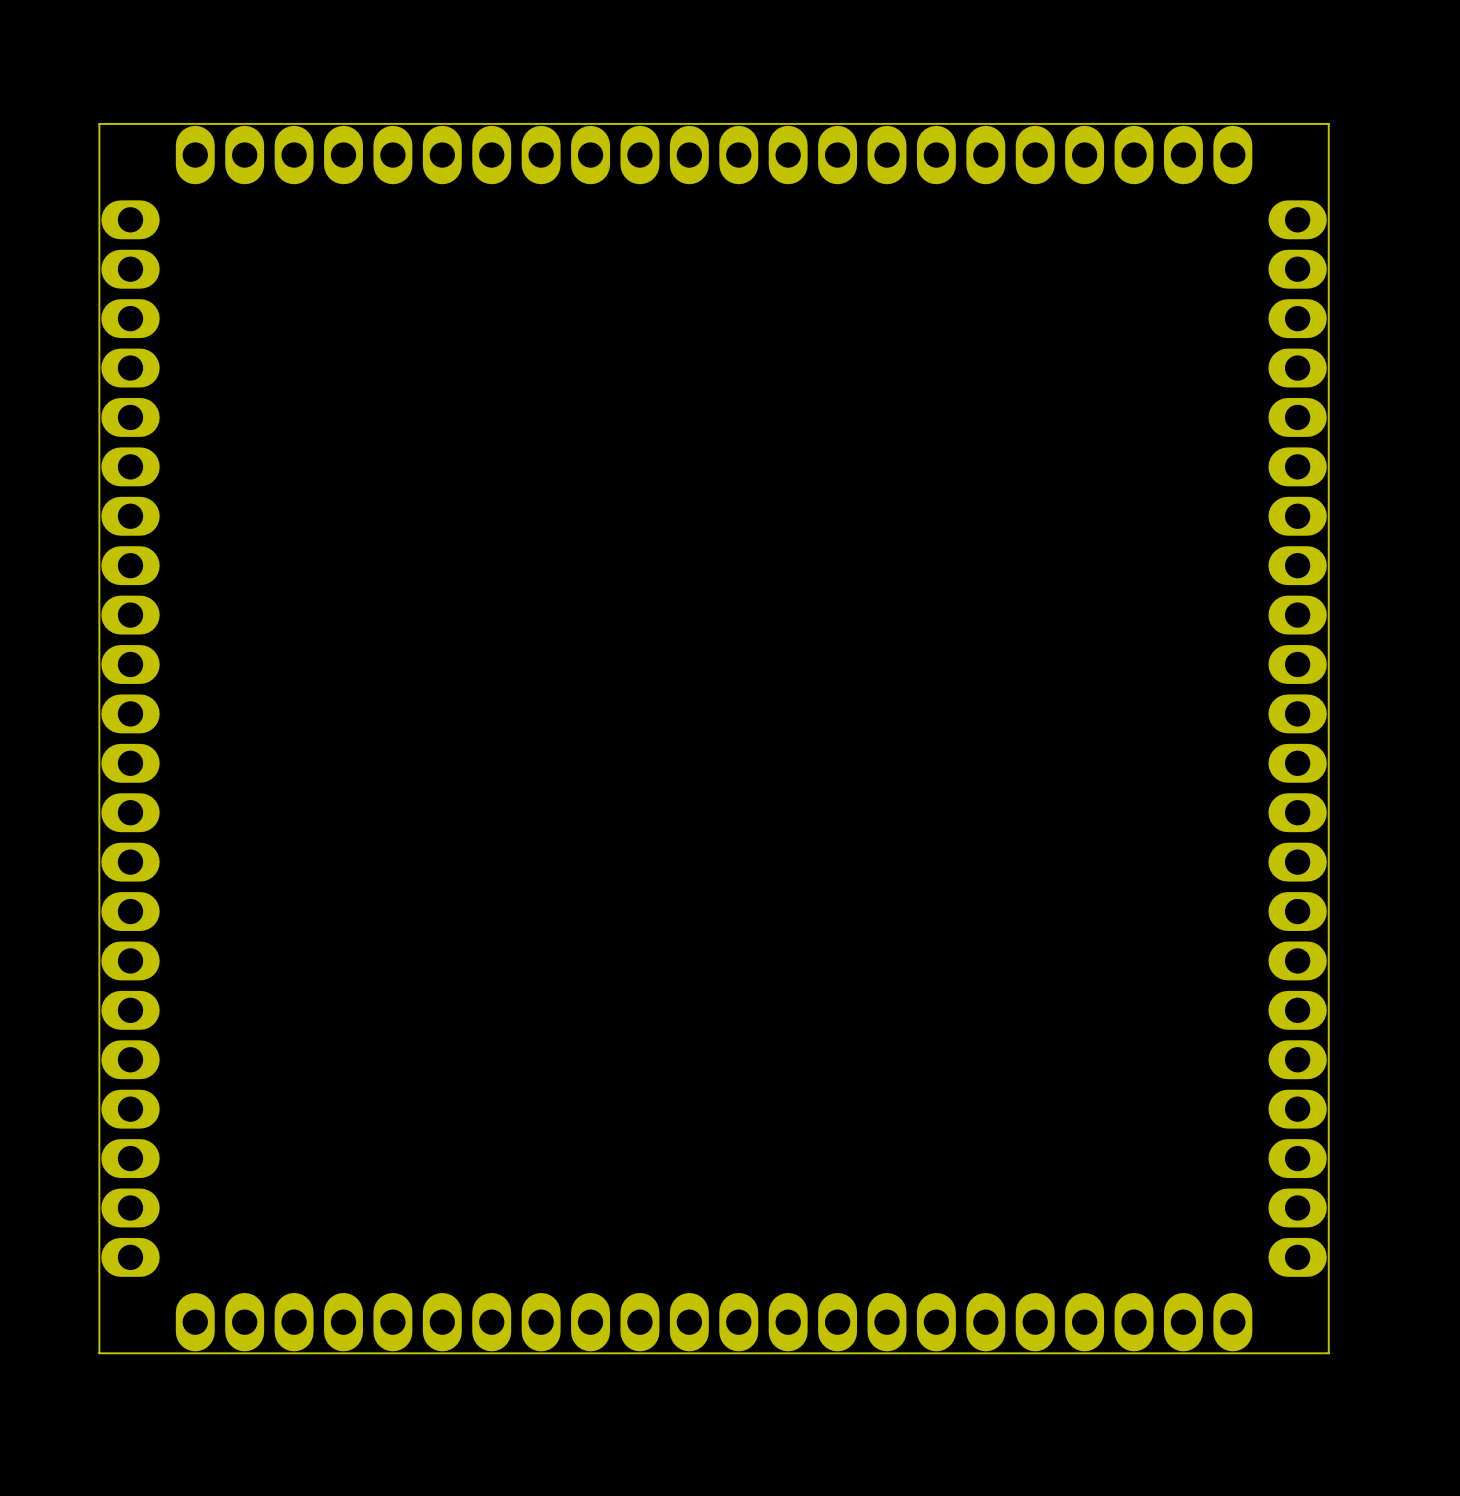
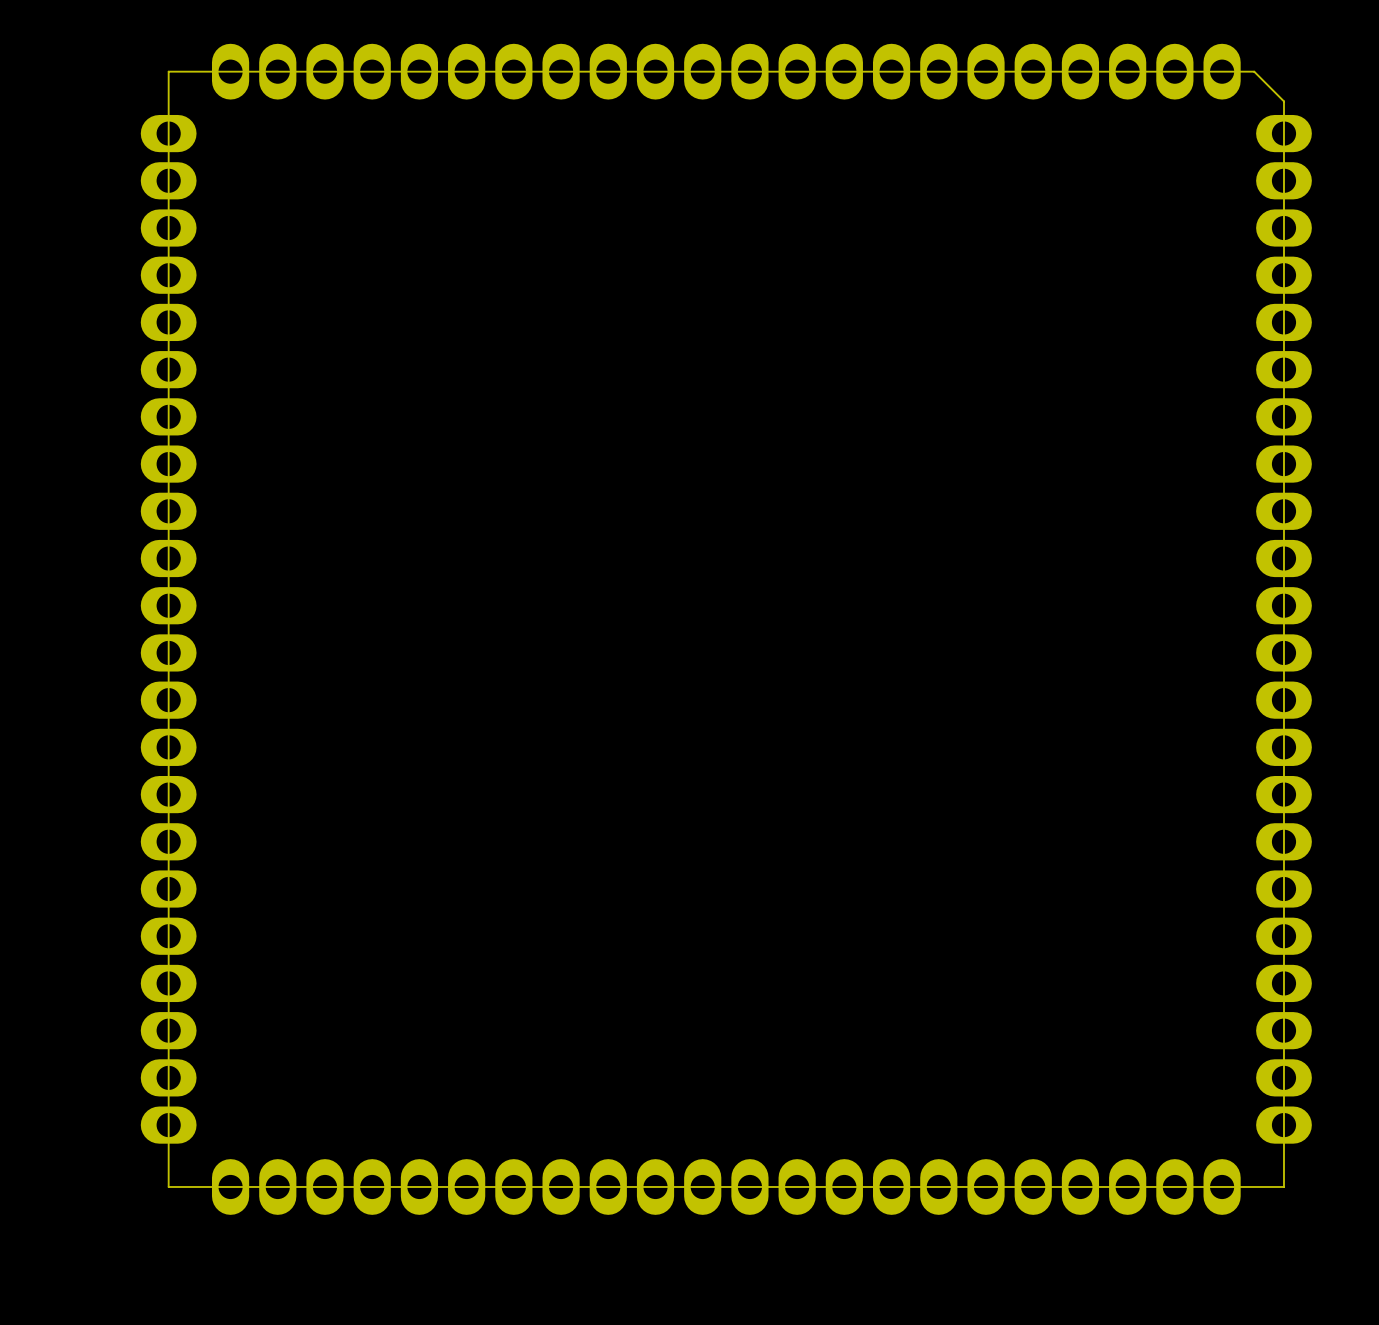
board edge: (1328, 123) (1328, 1353) (99, 1353) (99, 123) (1328, 123) -> (1254, 71) (1283, 101) (1283, 1186) (168, 1186) (168, 71) (1254, 71)

